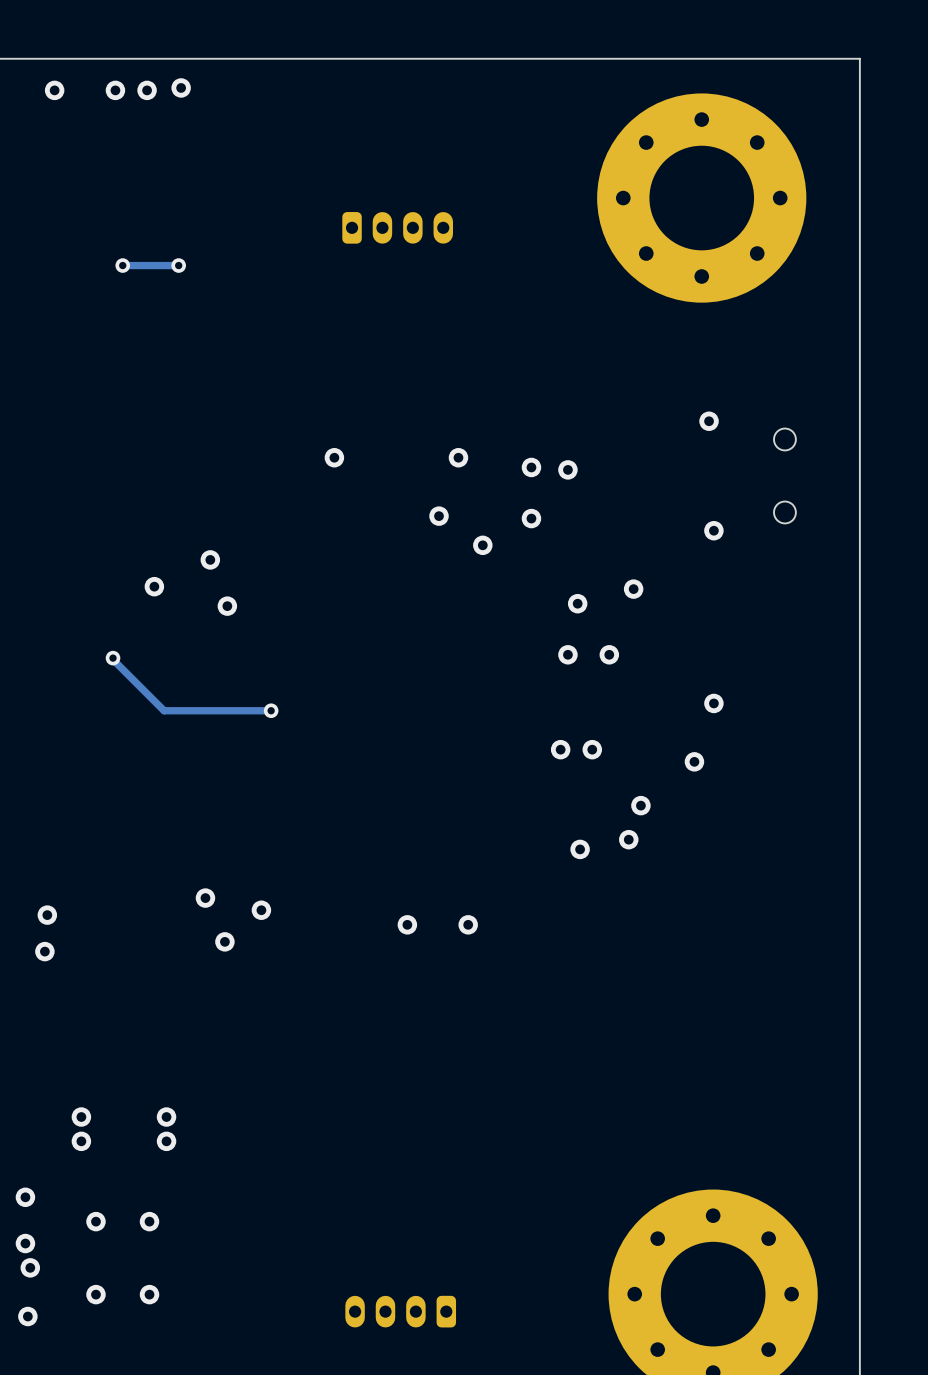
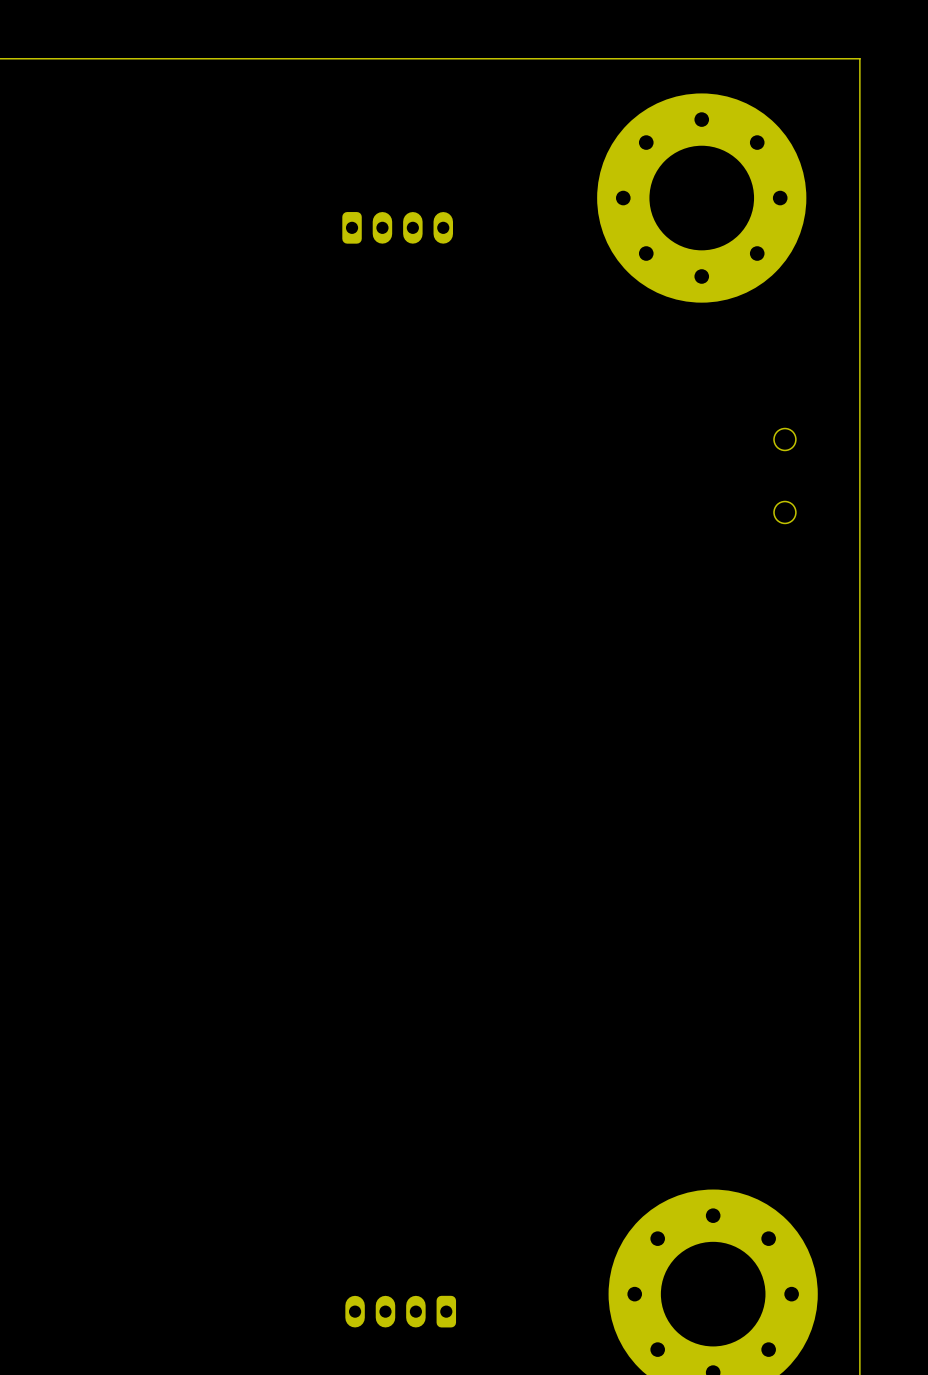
via: (181, 87) -> none
via: (54, 90) -> none
via: (115, 90) -> none
via: (147, 90) -> none
via: (122, 265) -> none
track: (178, 265) (122, 265) -> none
via: (178, 265) -> none
via: (709, 421) -> none
via: (334, 457) -> none
via: (458, 457) -> none
via: (531, 467) -> none
via: (567, 469) -> none
via: (439, 516) -> none
via: (531, 518) -> none
via: (713, 530) -> none
via: (482, 545) -> none
via: (210, 559) -> none
via: (154, 586) -> none
via: (633, 589) -> none
via: (577, 603) -> none
via: (227, 606) -> none
via: (567, 654) -> none
via: (609, 654) -> none
track: (113, 658) (164, 710) (271, 710) -> none
via: (113, 658) -> none
via: (713, 703) -> none
via: (271, 710) -> none
via: (560, 749) -> none
via: (592, 749) -> none
via: (694, 761) -> none
via: (640, 805) -> none
via: (628, 839) -> none
via: (580, 849) -> none
via: (205, 898) -> none
via: (261, 910) -> none
via: (47, 915) -> none
via: (407, 924) -> none
via: (468, 924) -> none
via: (224, 941) -> none
via: (44, 951) -> none
via: (81, 1117) -> none
via: (166, 1117) -> none
via: (81, 1141) -> none
via: (166, 1141) -> none
via: (25, 1197) -> none
via: (95, 1221) -> none
via: (149, 1221) -> none
via: (25, 1243) -> none
via: (30, 1267) -> none
via: (95, 1294) -> none
via: (149, 1294) -> none
via: (27, 1316) -> none

